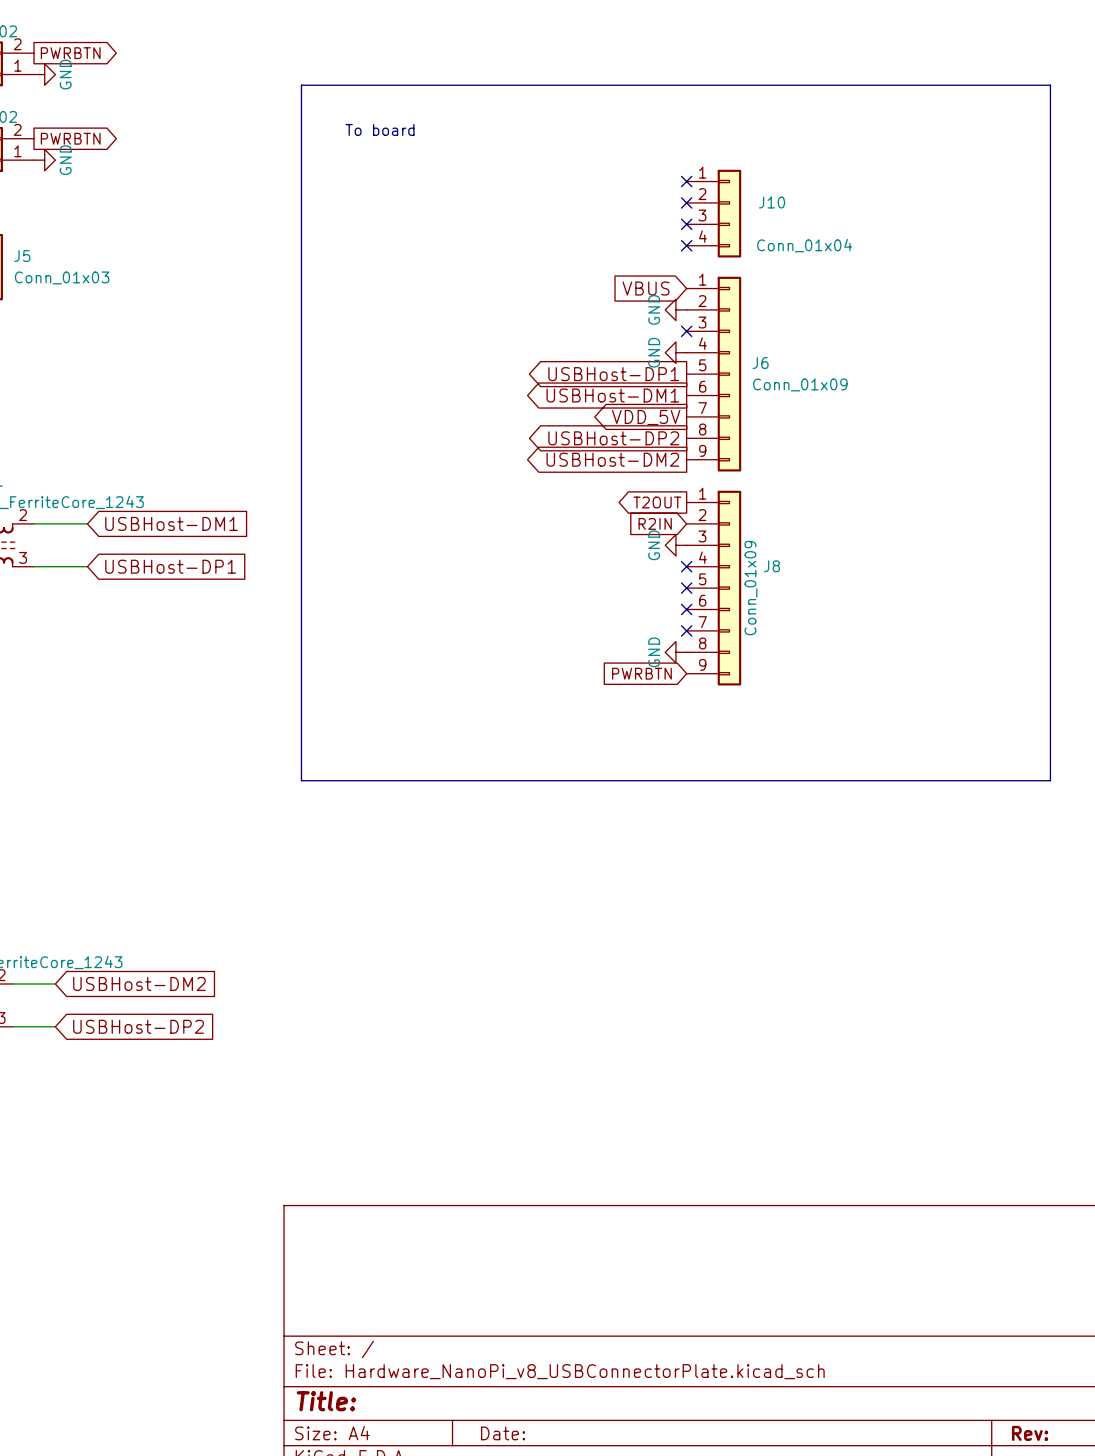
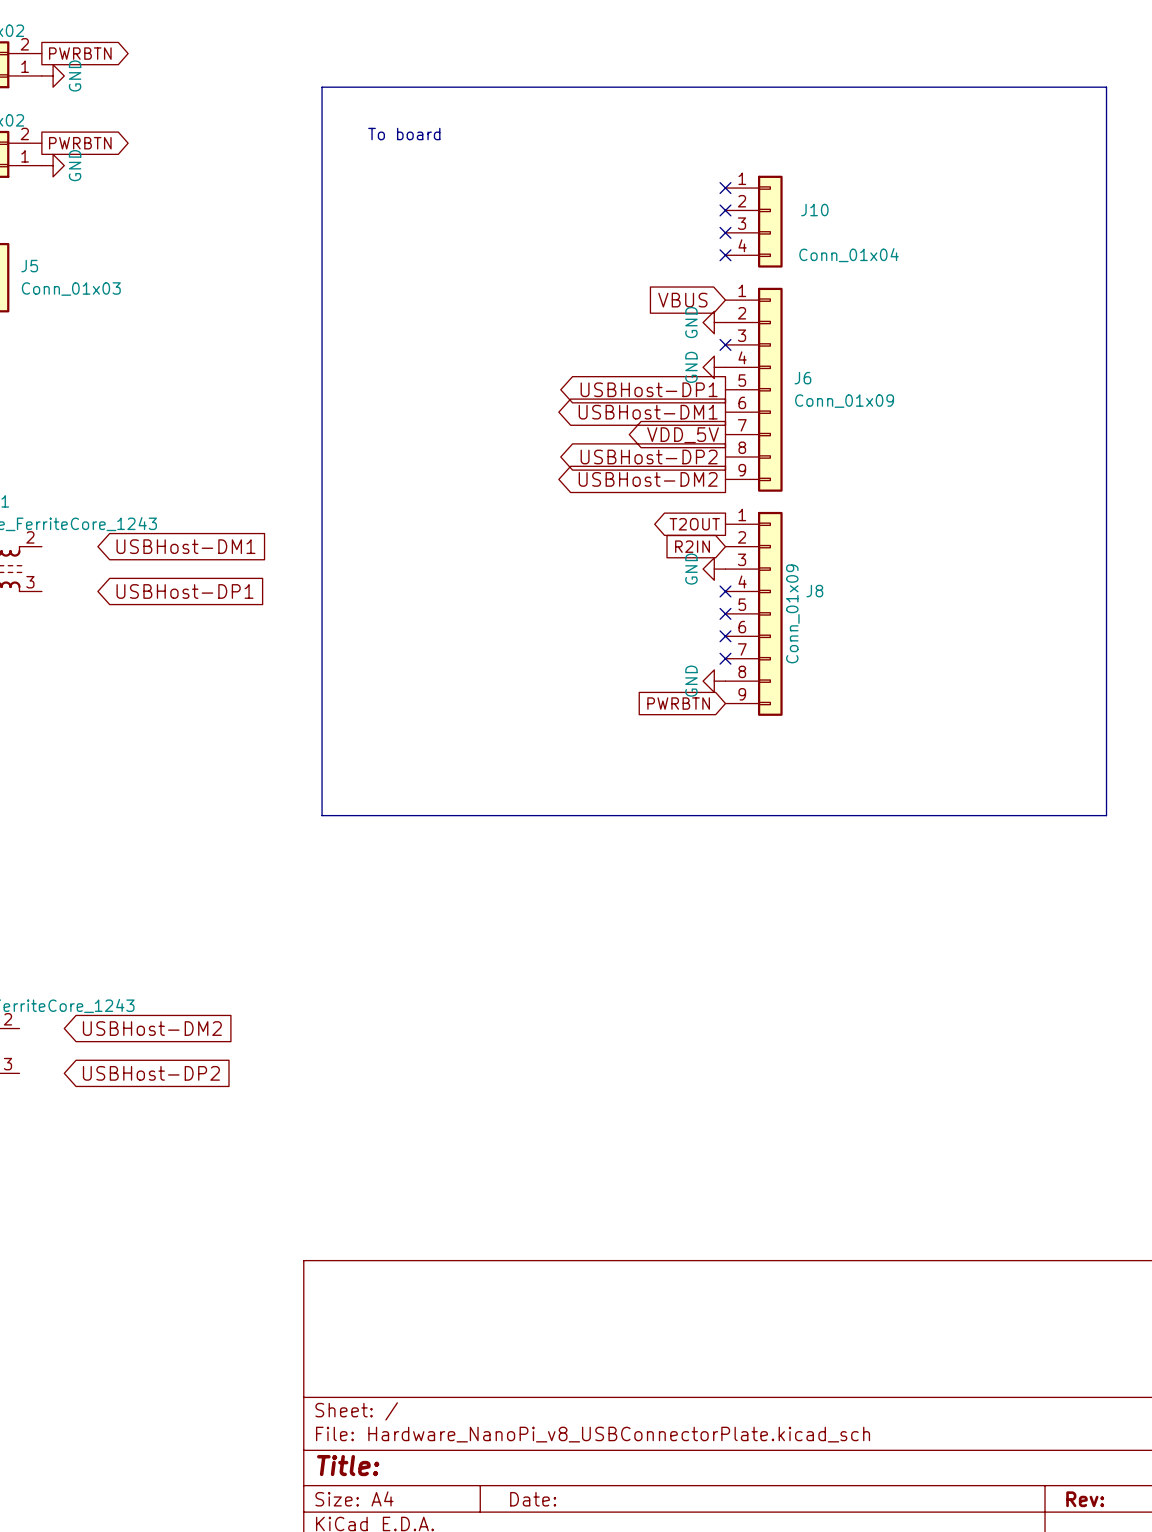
wire: (33, 523) (87, 523) -> none
wire: (33, 566) (87, 566) -> none
wire: (12, 983) (55, 983) -> none
wire: (12, 1026) (55, 1026) -> none

